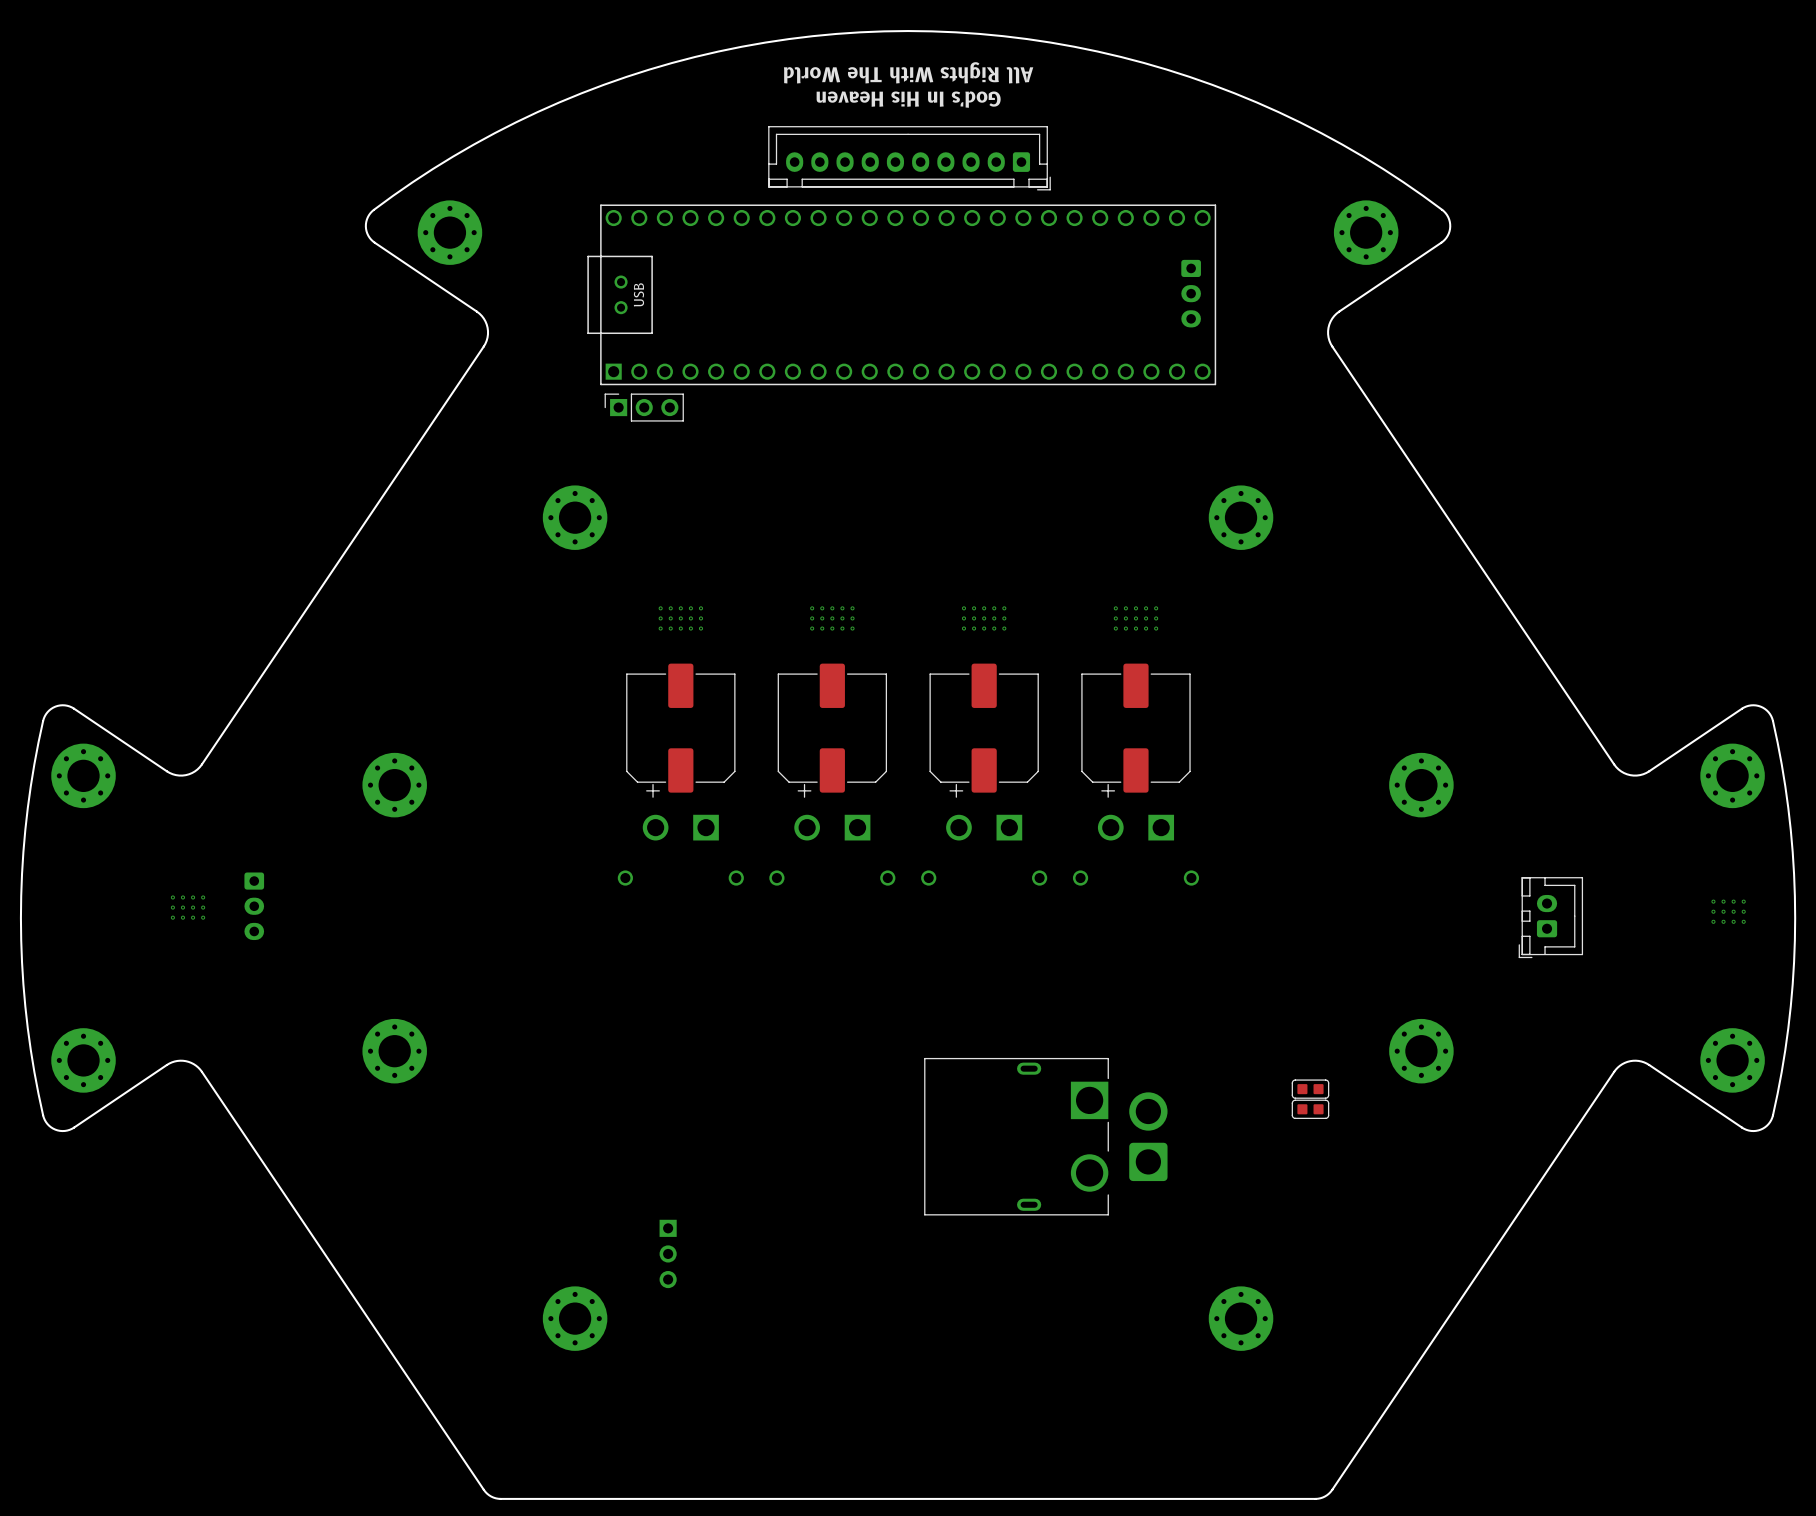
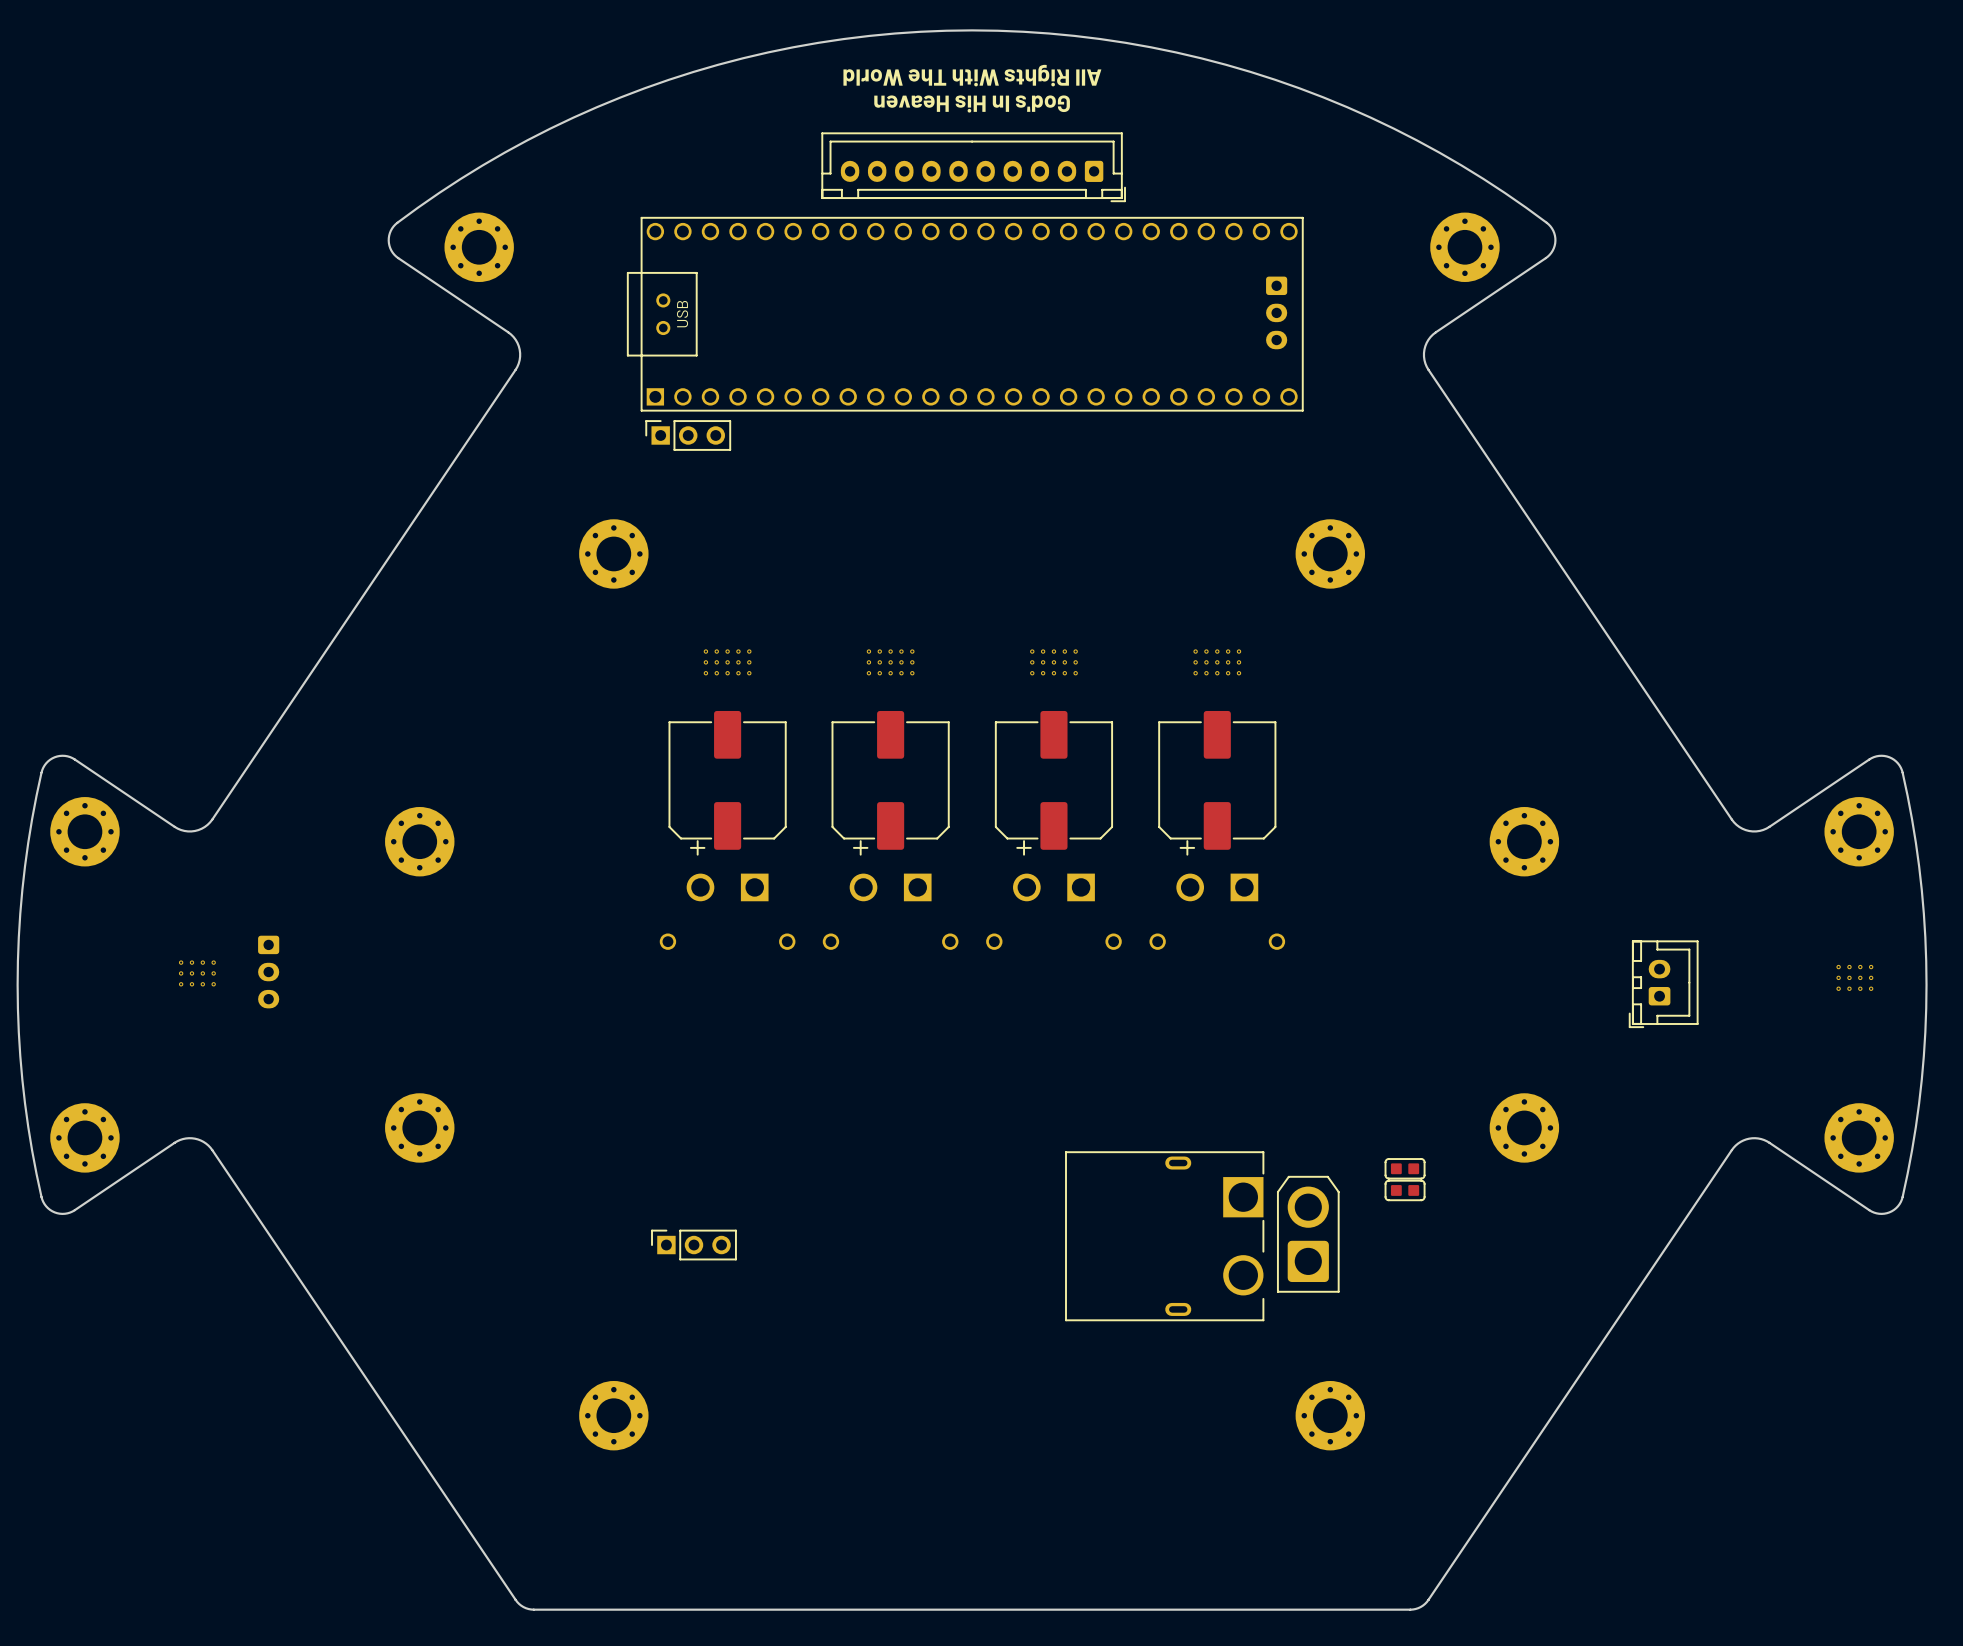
part position: (1016, 1136) -> (1164, 1236)
part side: bottom (1148, 1136) -> top (1308, 1234)
part side: bottom (668, 1253) -> top (693, 1245)

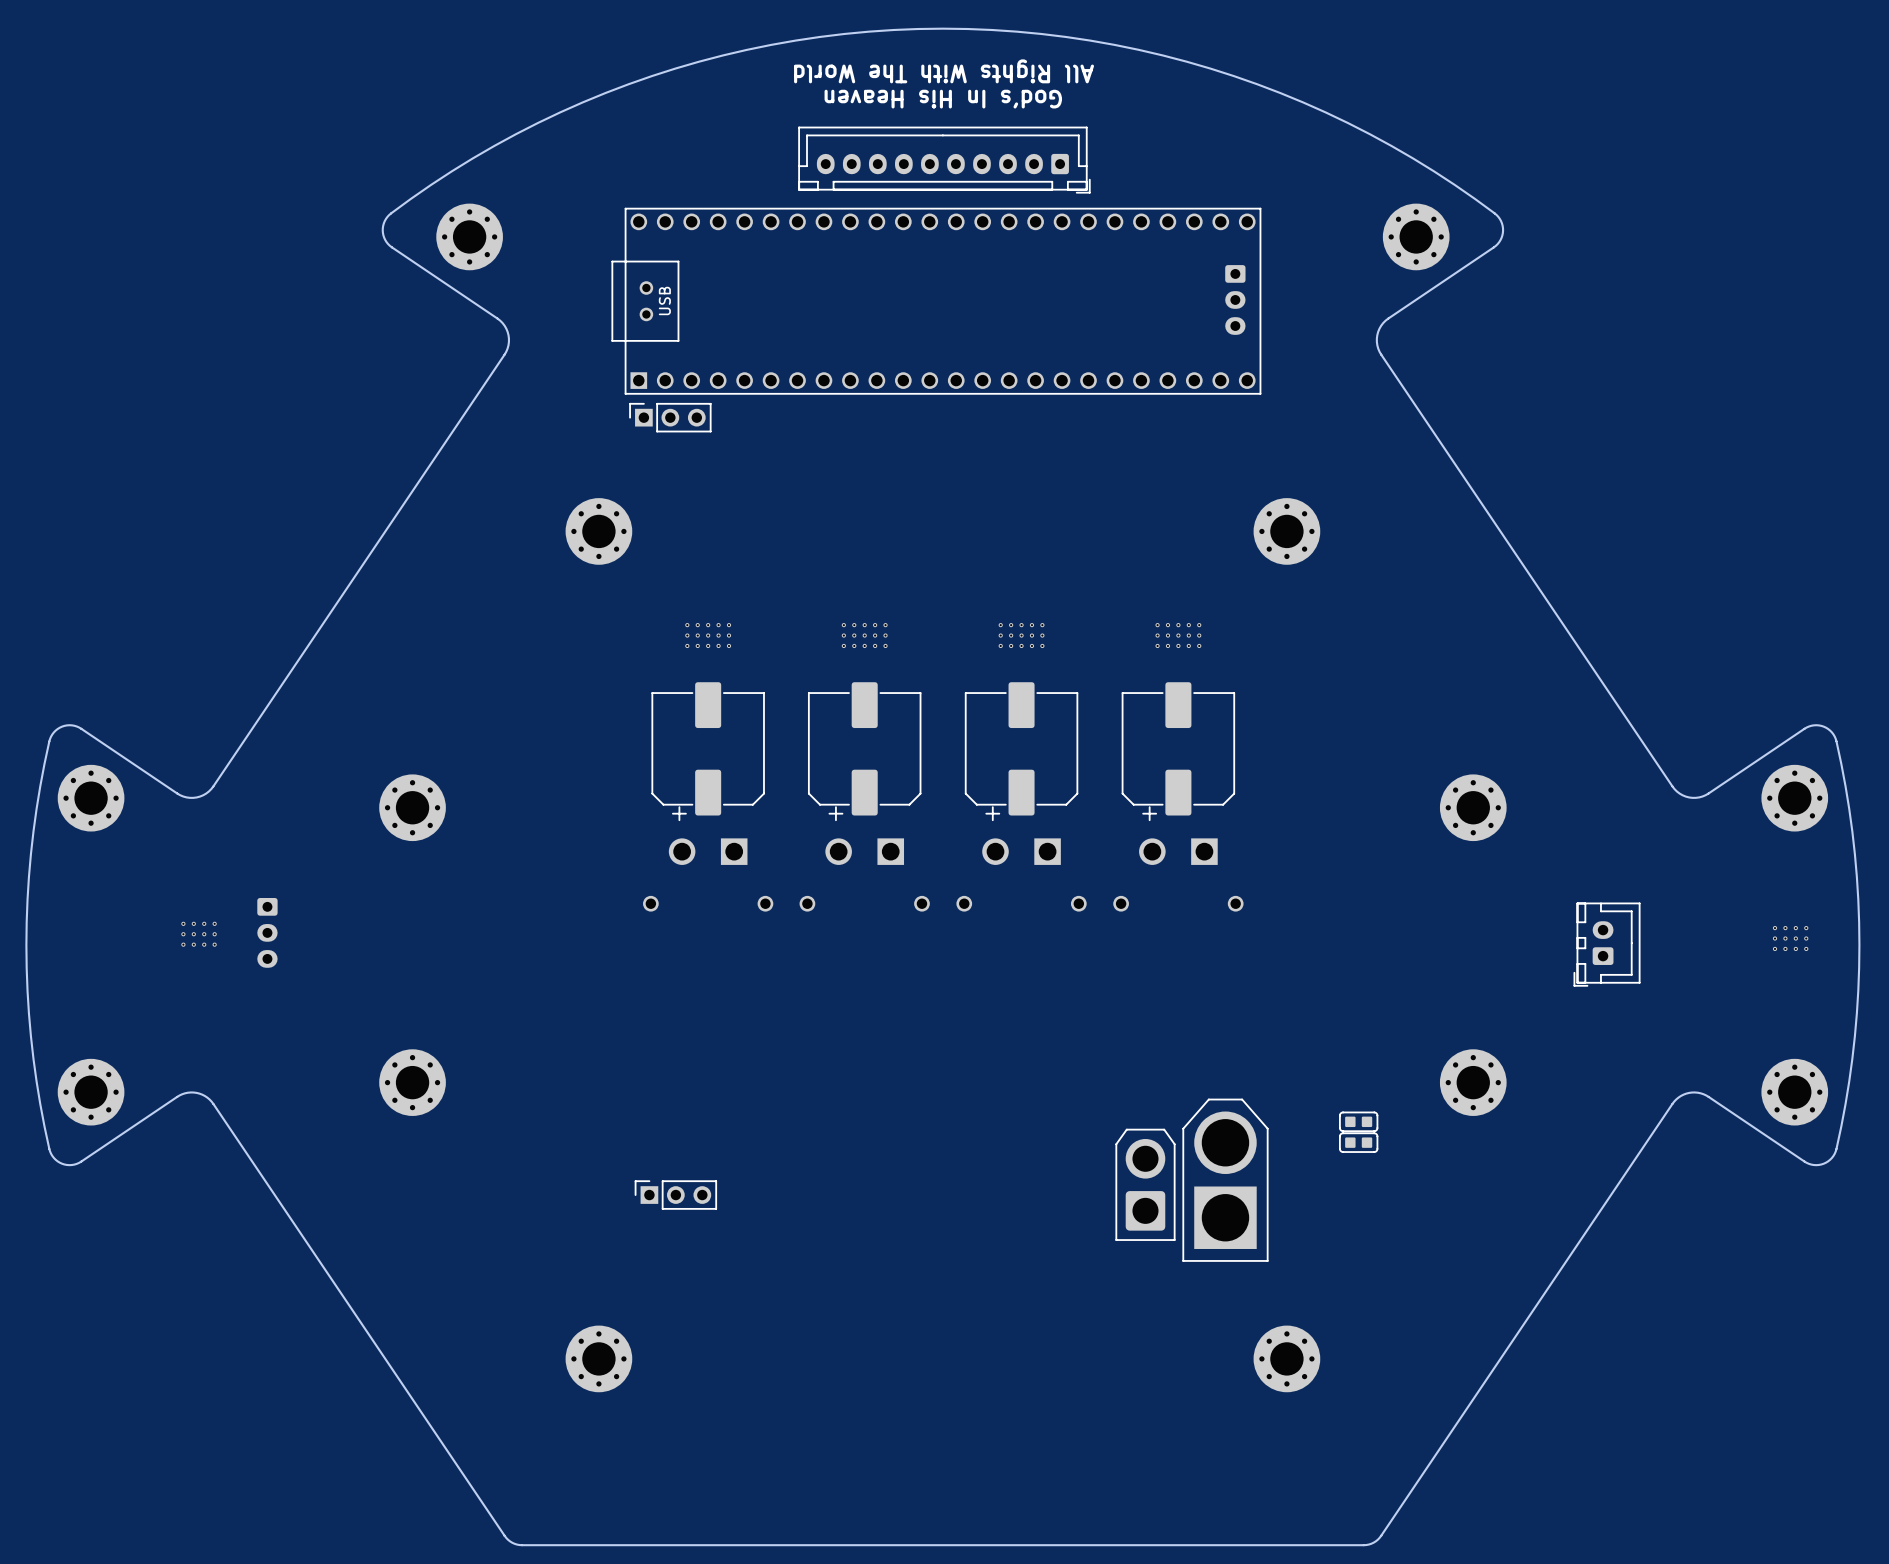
part: none -> (1225, 1180)
part position: (1308, 1234) -> (1145, 1184)
part: (1164, 1236) -> none

